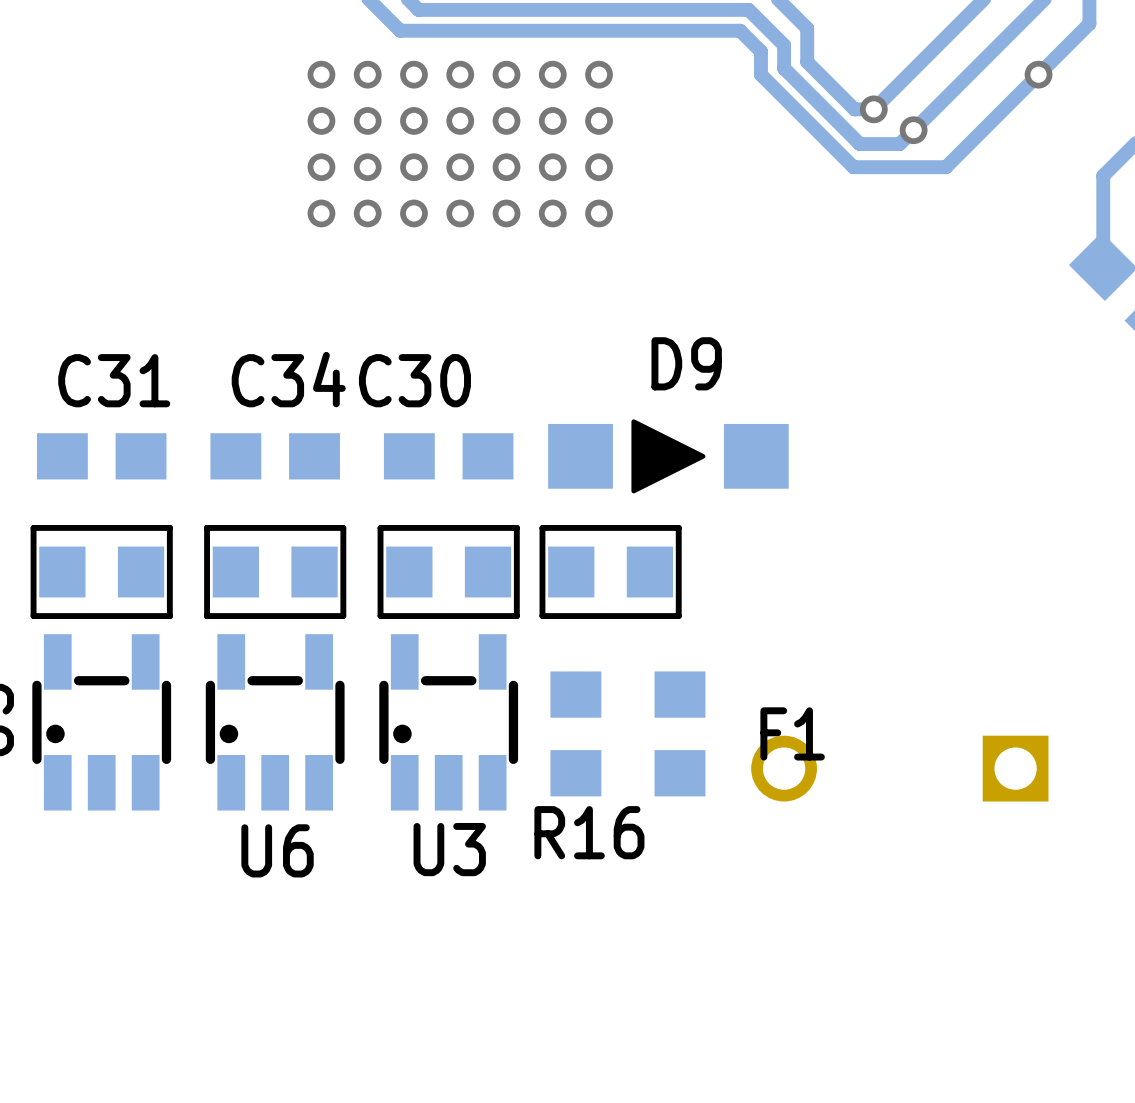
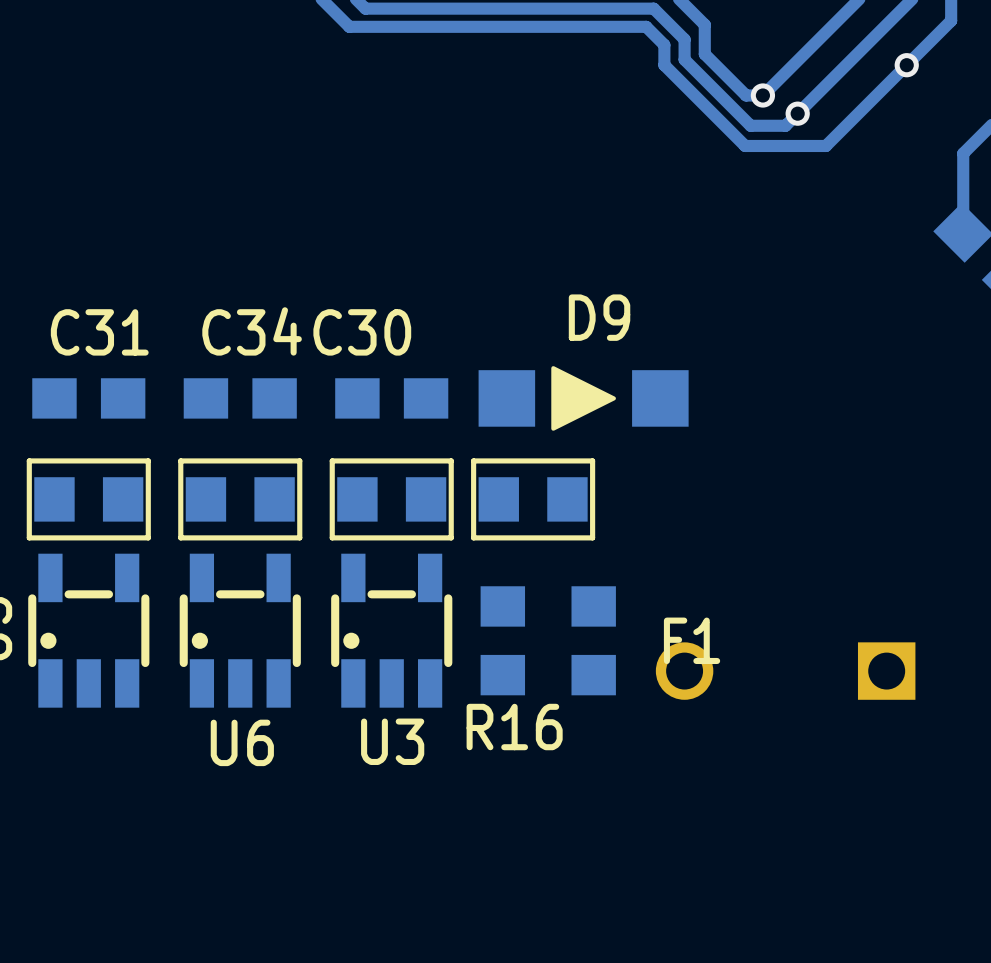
via: (321, 74) -> none
via: (367, 74) -> none
via: (413, 74) -> none
via: (460, 74) -> none
via: (506, 74) -> none
via: (552, 74) -> none
via: (599, 74) -> none
via: (321, 120) -> none
via: (367, 120) -> none
via: (413, 120) -> none
via: (460, 120) -> none
via: (506, 120) -> none
via: (552, 120) -> none
via: (599, 120) -> none
via: (321, 167) -> none
via: (367, 167) -> none
via: (413, 167) -> none
via: (460, 167) -> none
via: (506, 167) -> none
via: (552, 167) -> none
via: (599, 167) -> none
via: (321, 213) -> none
via: (367, 213) -> none
via: (413, 213) -> none
via: (460, 213) -> none
via: (506, 213) -> none
via: (552, 213) -> none
via: (599, 213) -> none

